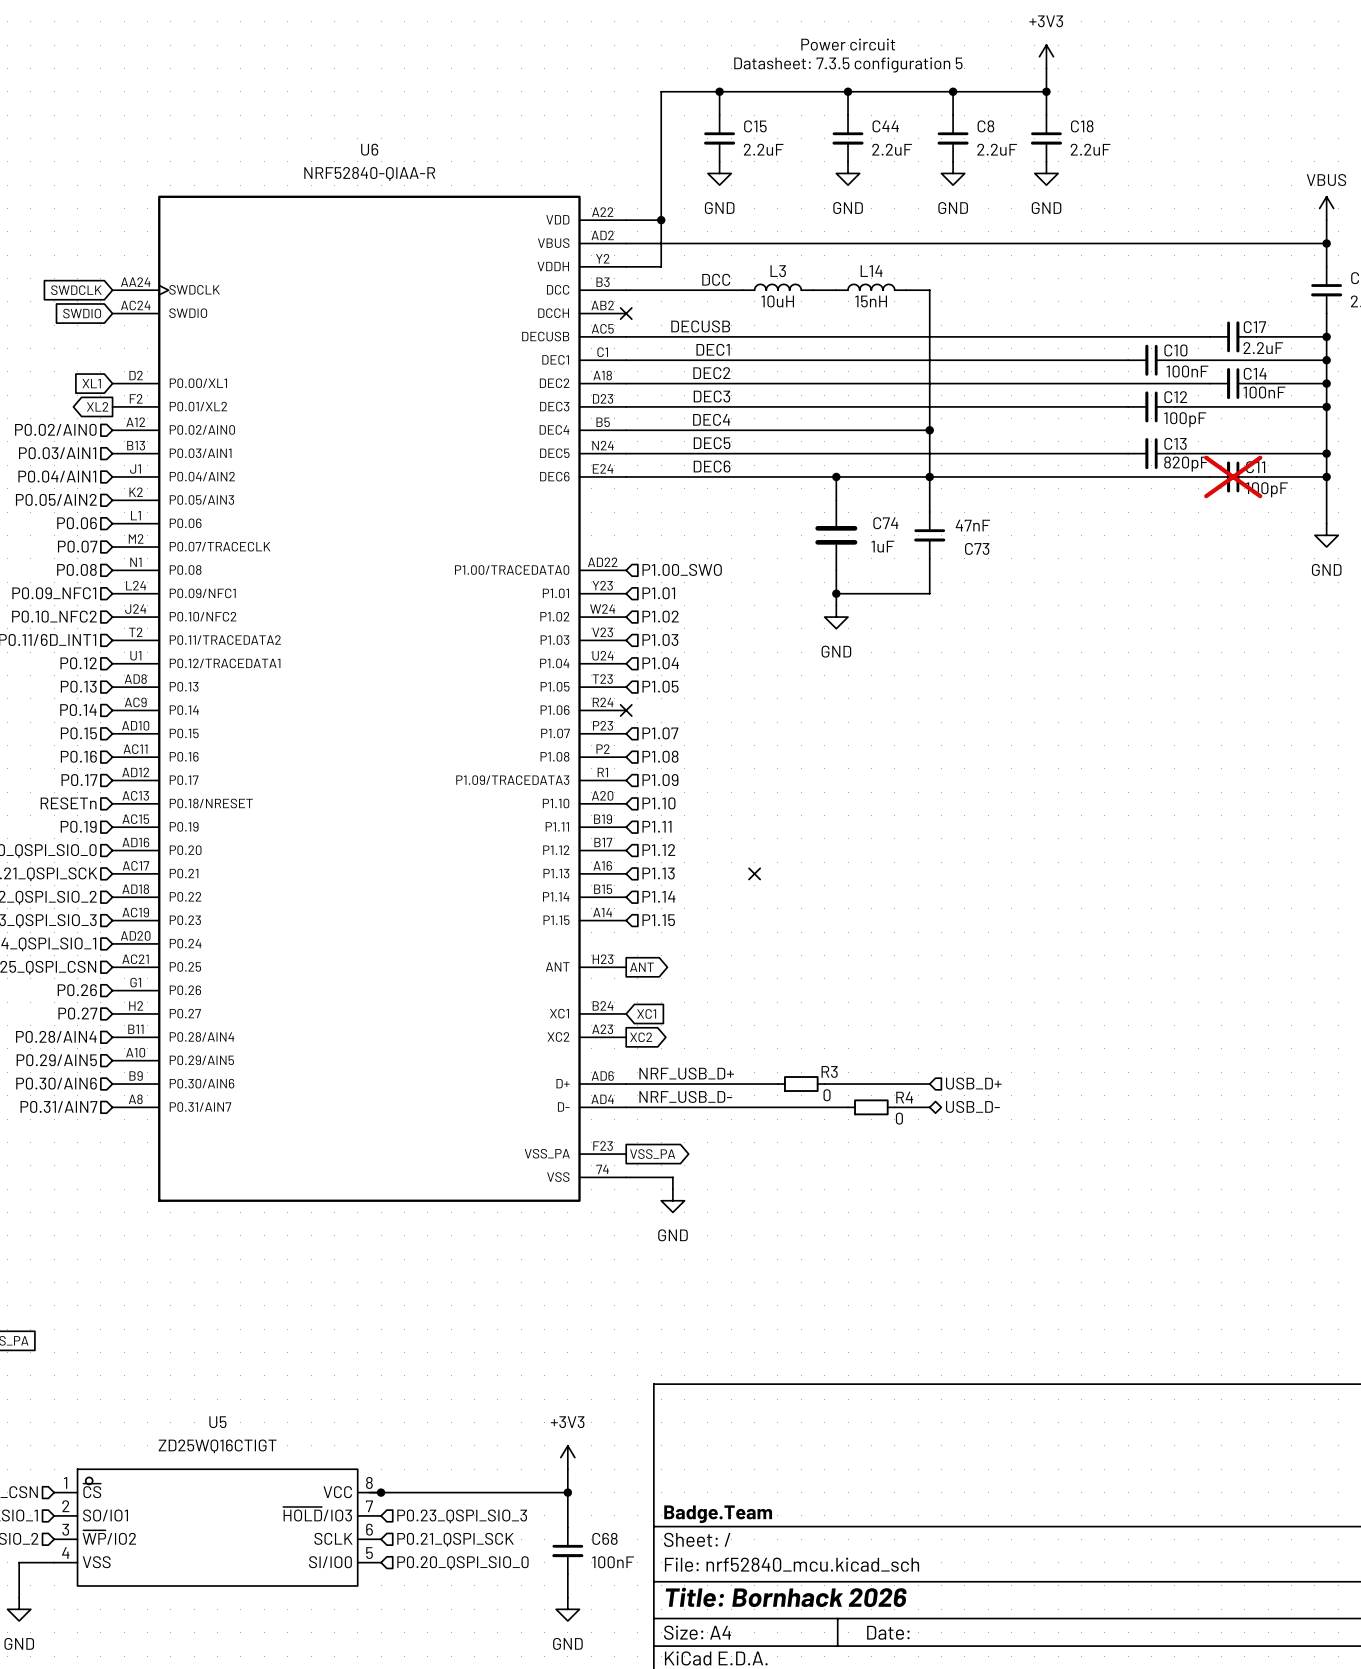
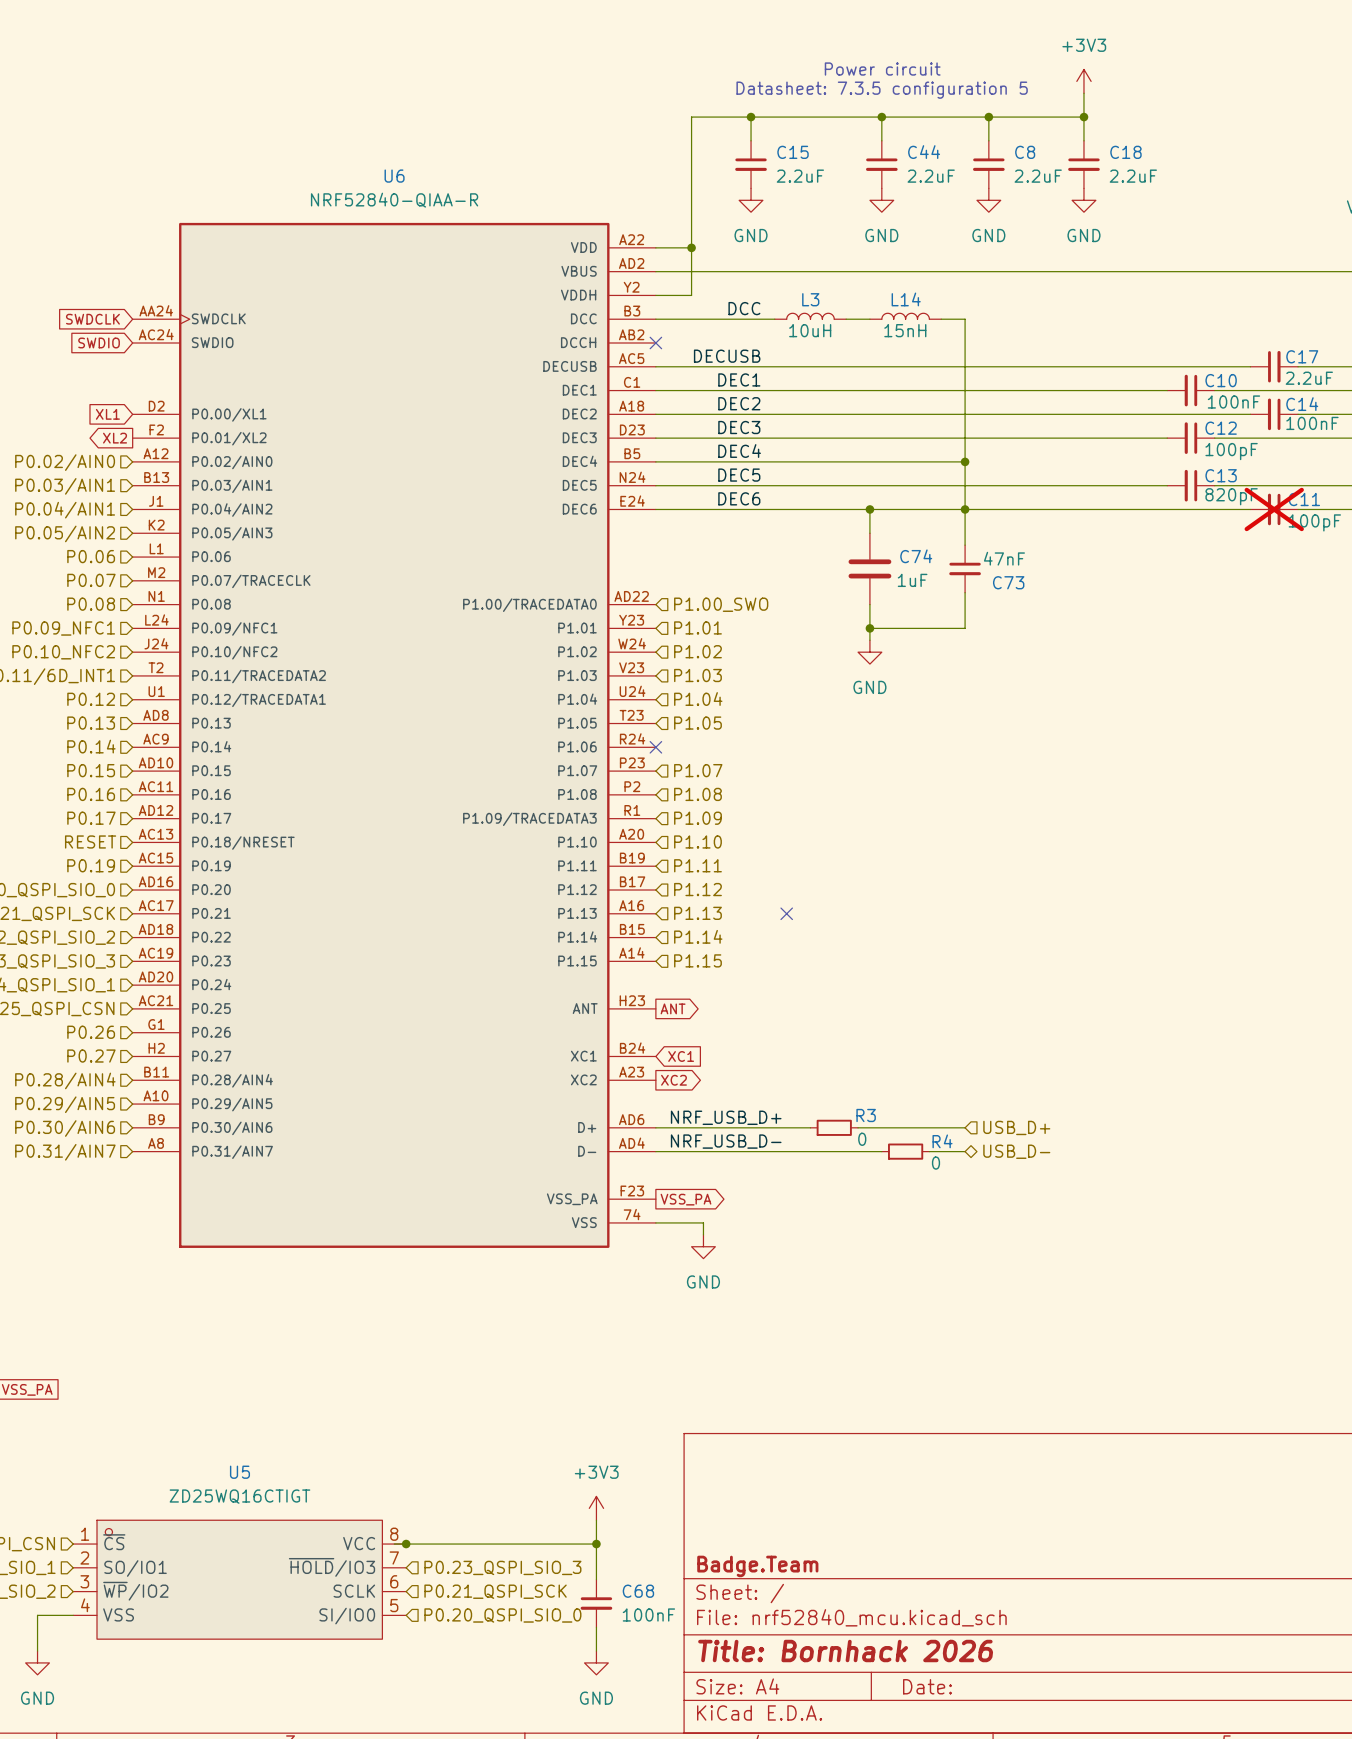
hierarchical label: RESETn (68, 803) -> RESET (90, 841)

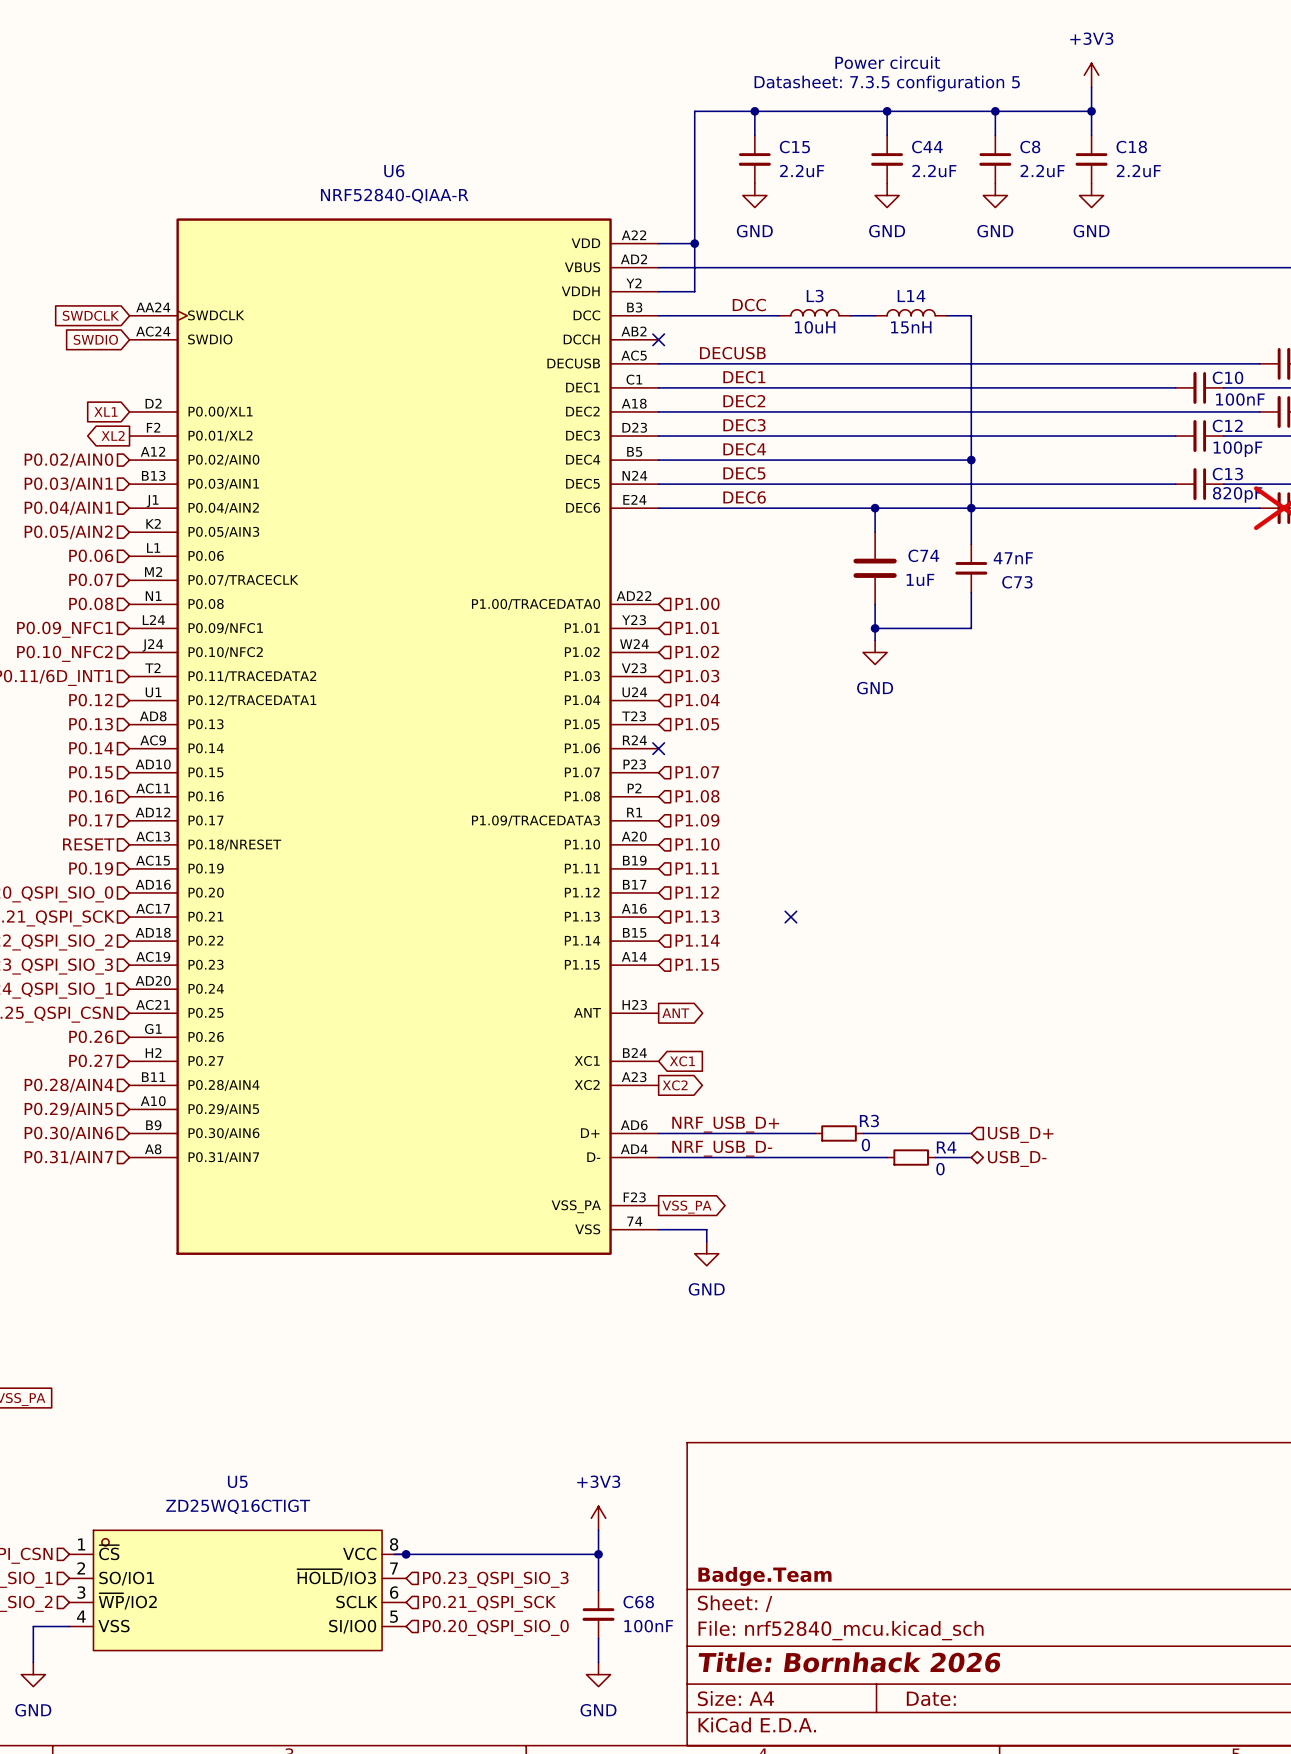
hierarchical label: P1.00_SWO (721, 604) -> P1.00 (697, 603)

